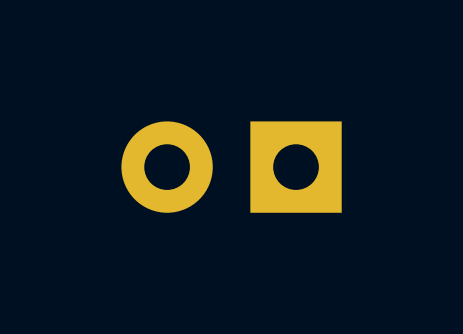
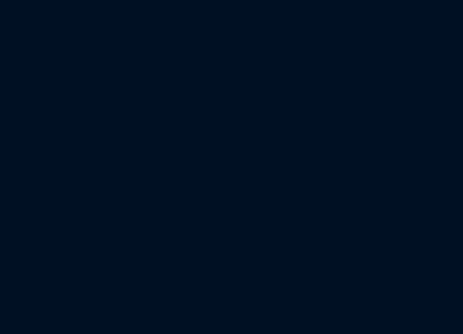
part: (231, 167) -> none

